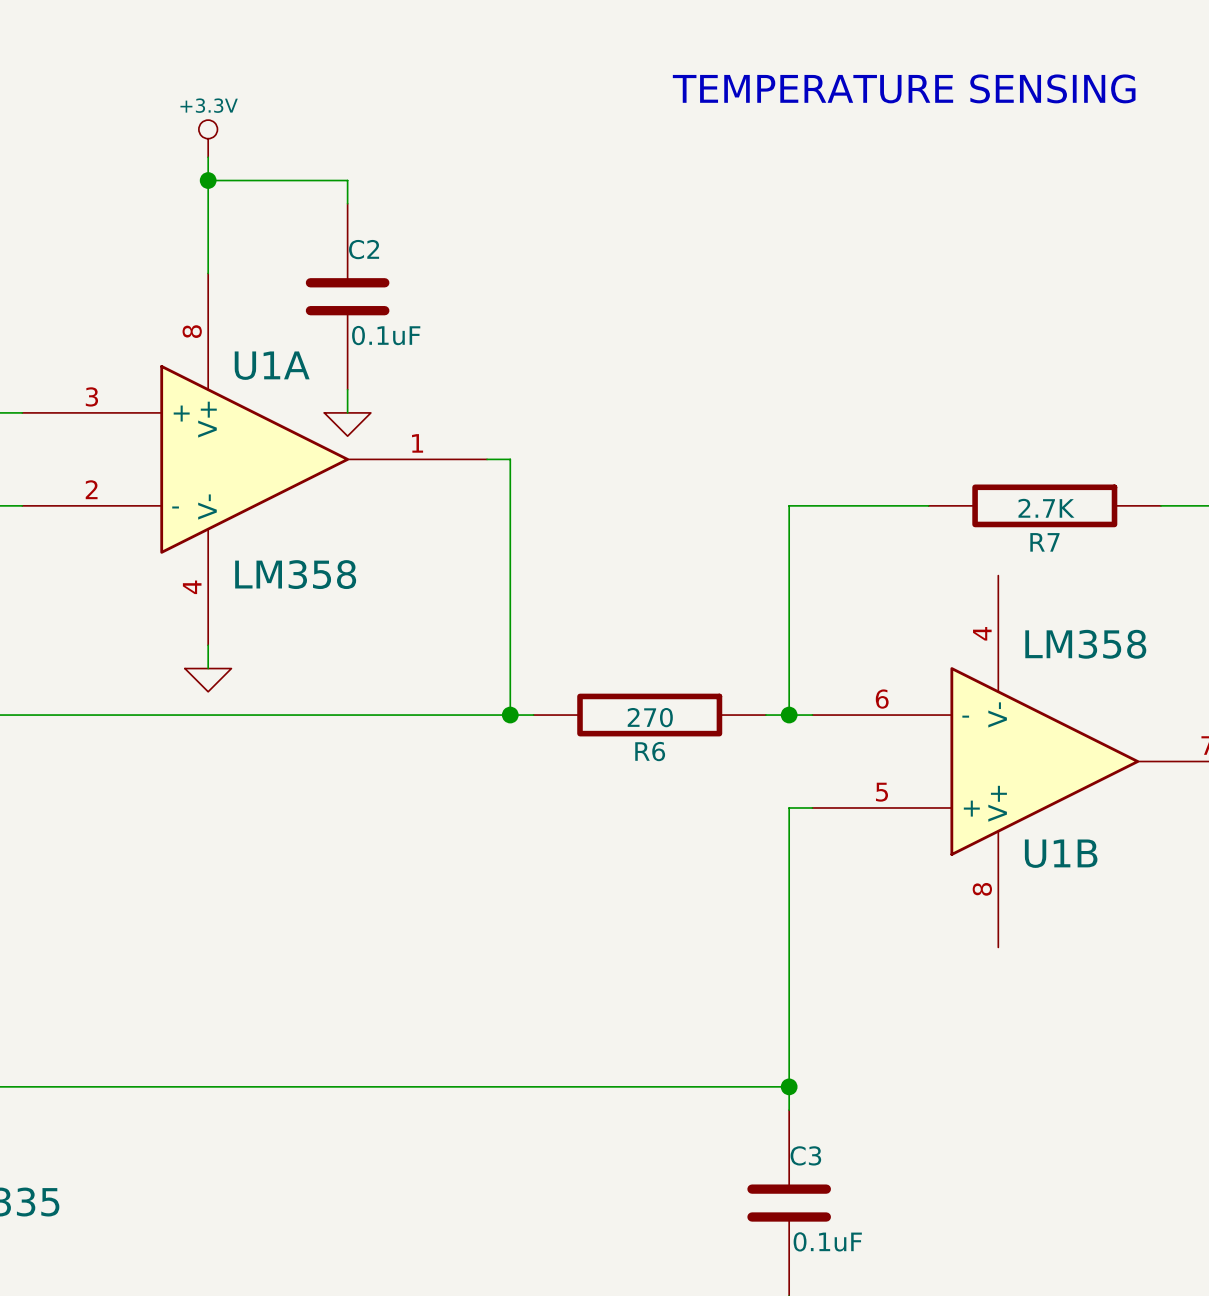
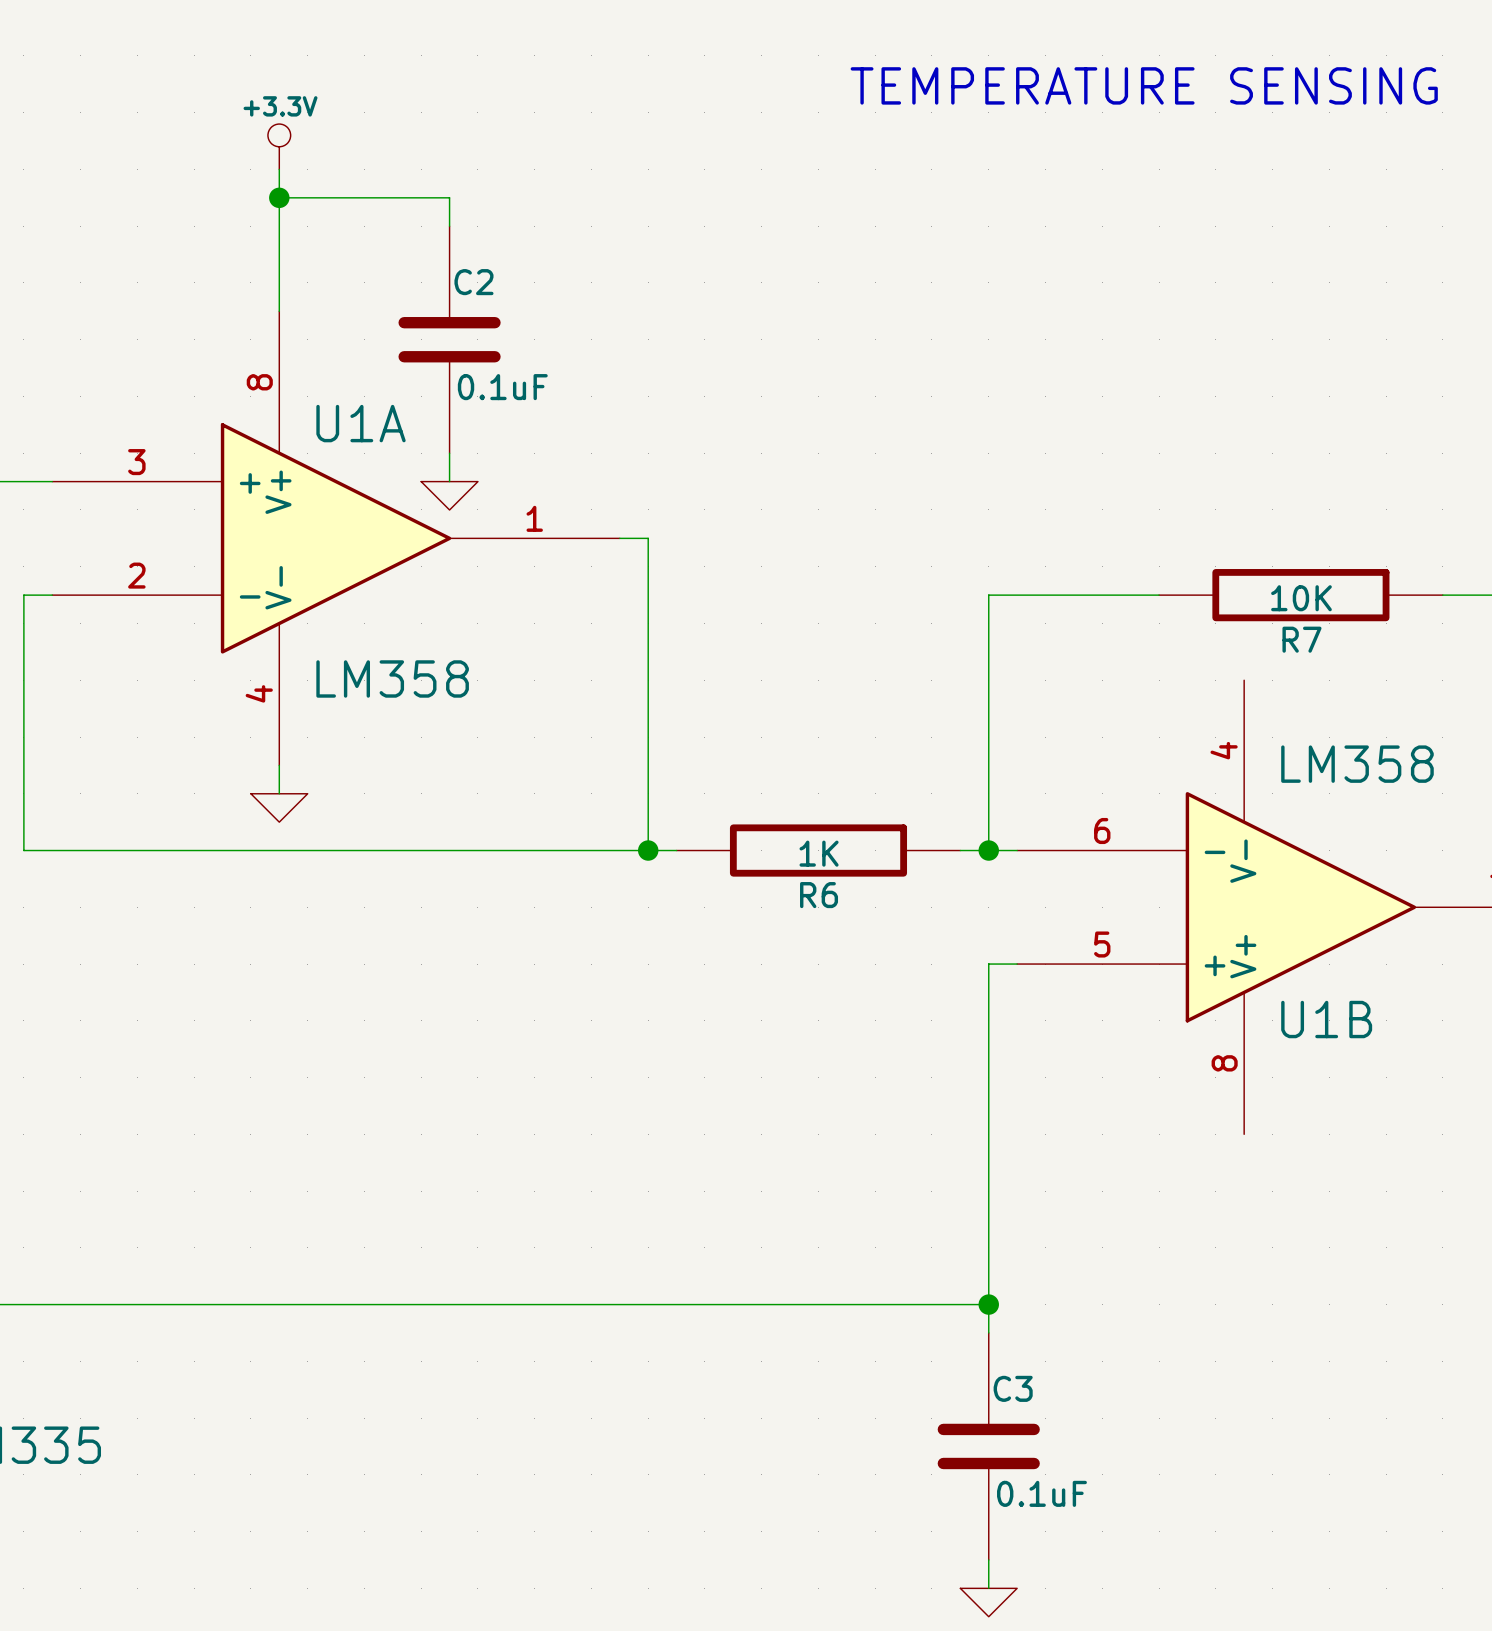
R7 value: 2.7K (1046, 508) -> 10K (1301, 598)
R6 value: 270 (650, 717) -> 1K (819, 853)

